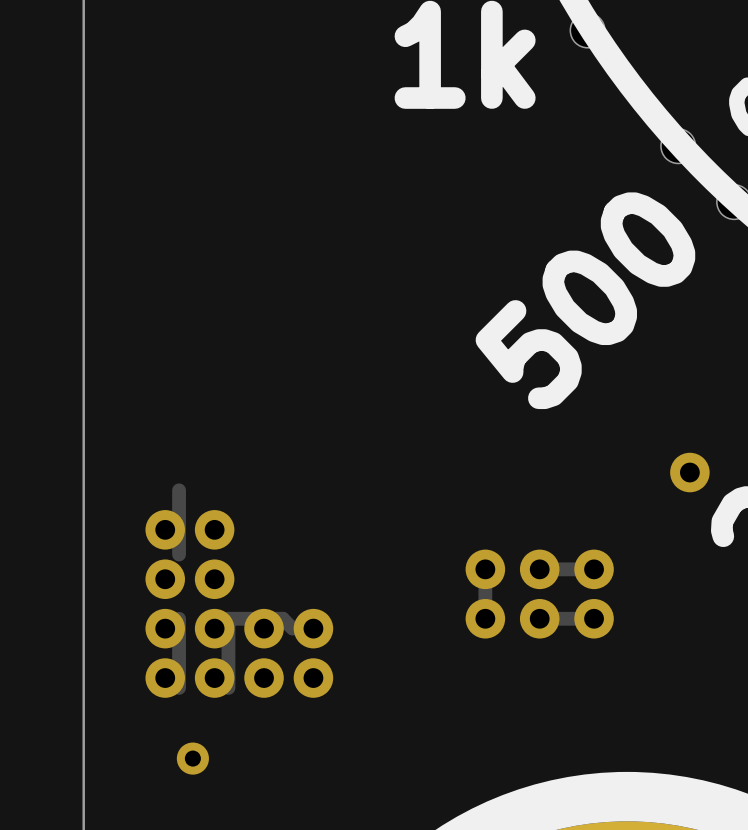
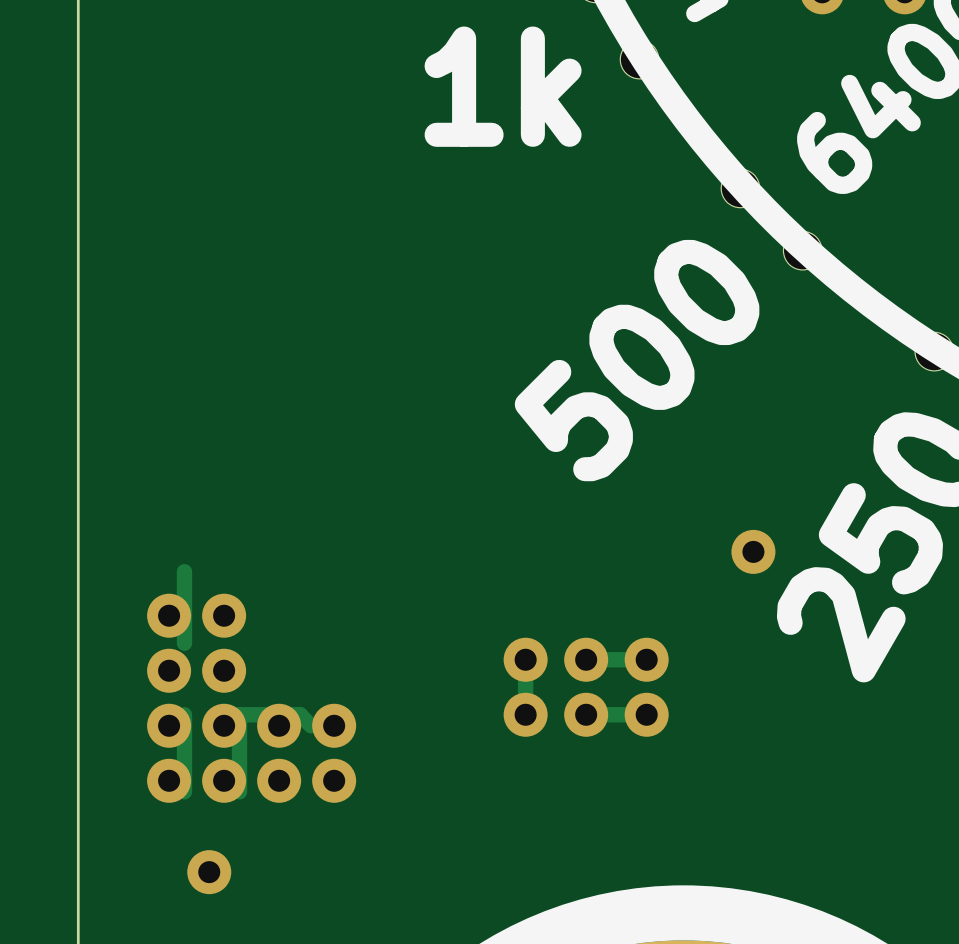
via size: [176, 742, 209, 775] -> [187, 850, 232, 895]

